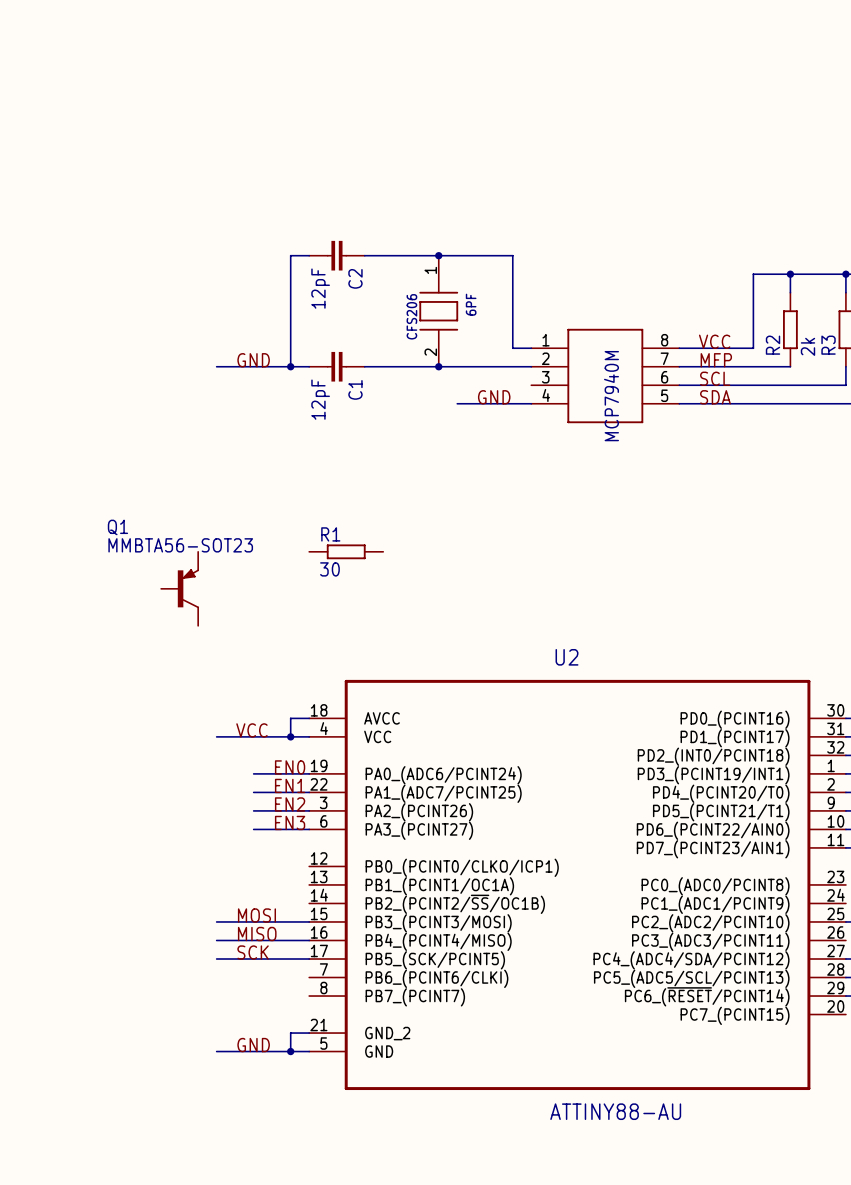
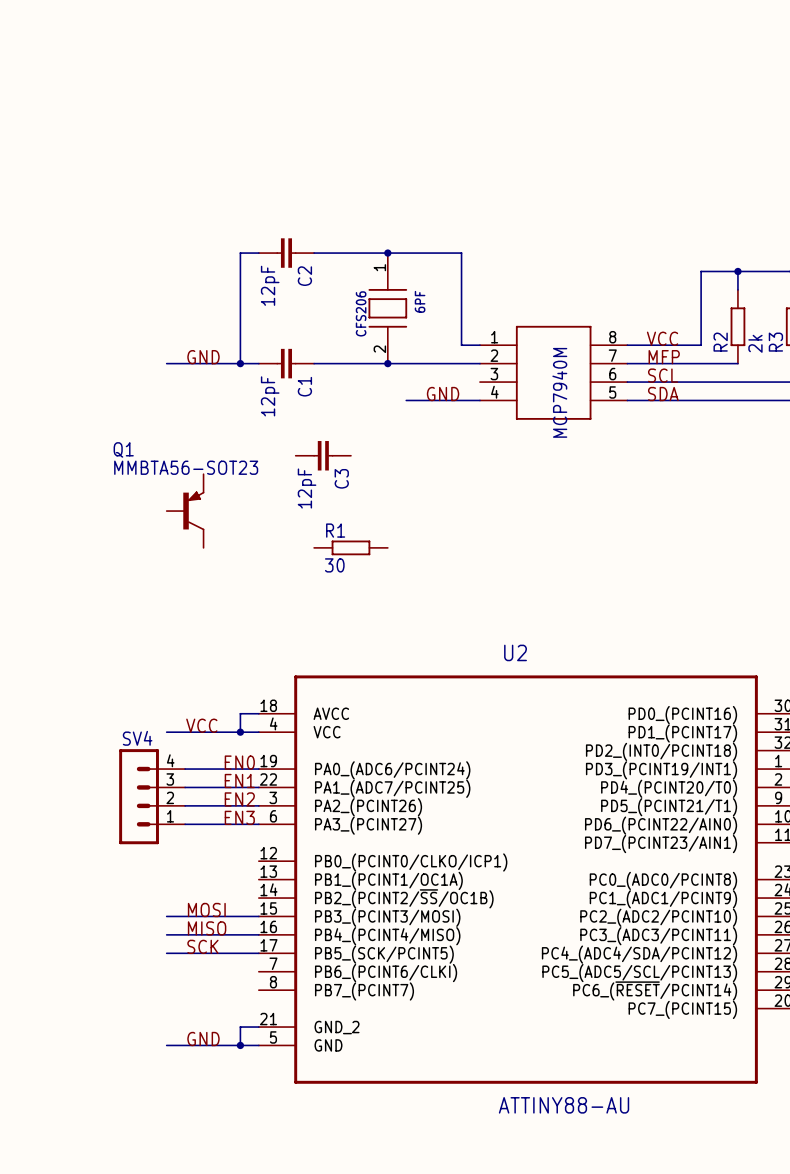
C3: none -> 12pF (323, 455)
R1 position: (346, 551) -> (350, 547)
Q1 position: (179, 588) -> (185, 511)
wire: none -> (185, 769) (203, 769)
wire: none -> (185, 787) (203, 787)
SV4: none -> (152, 796)
wire: none -> (185, 805) (203, 805)
wire: none -> (185, 824) (203, 824)

